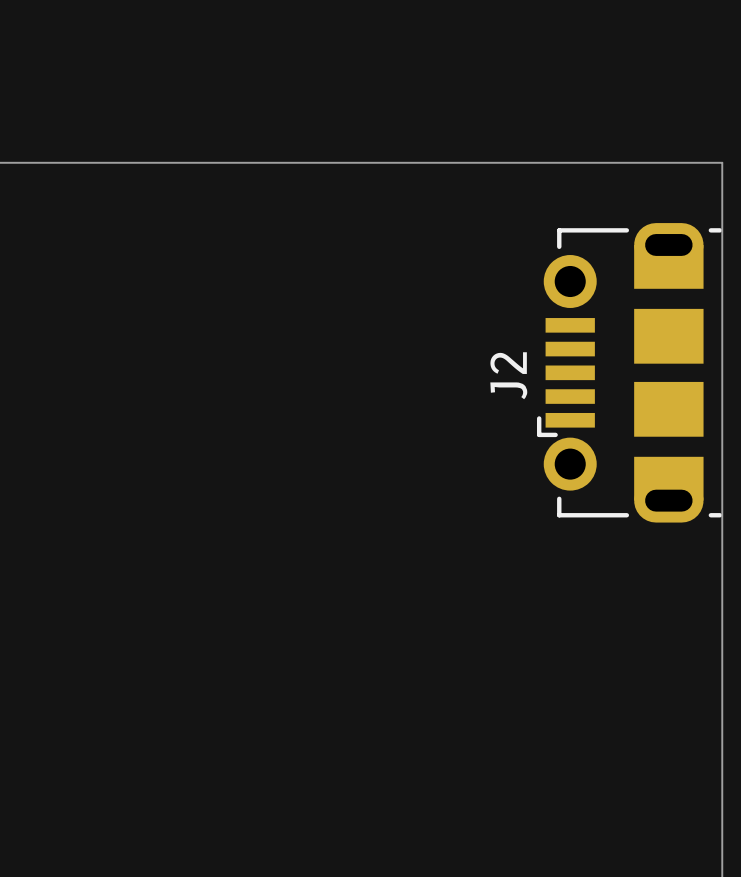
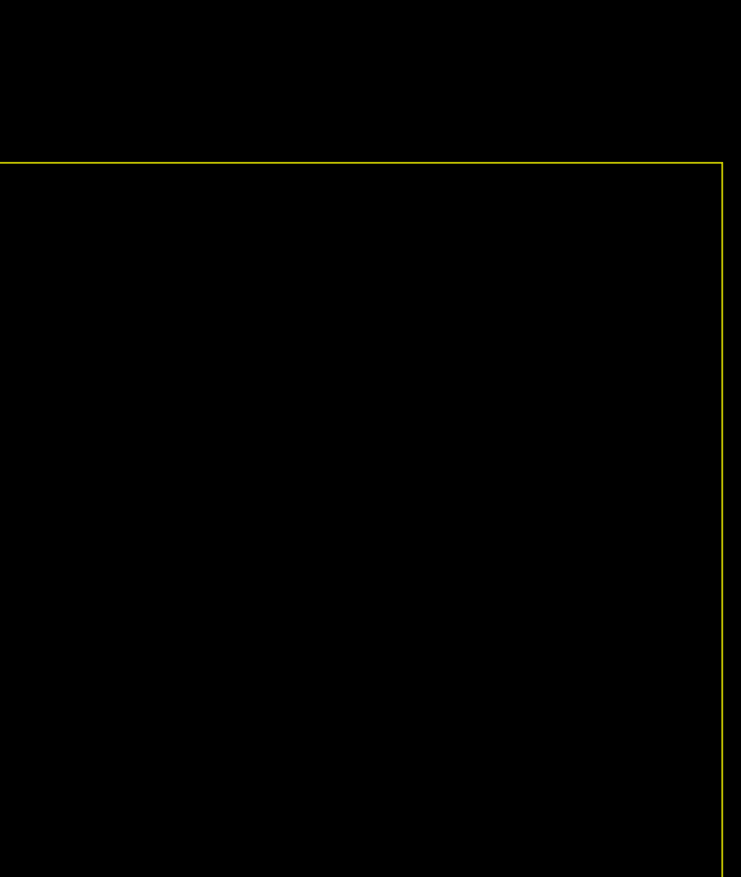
J2: (629, 372) -> none

